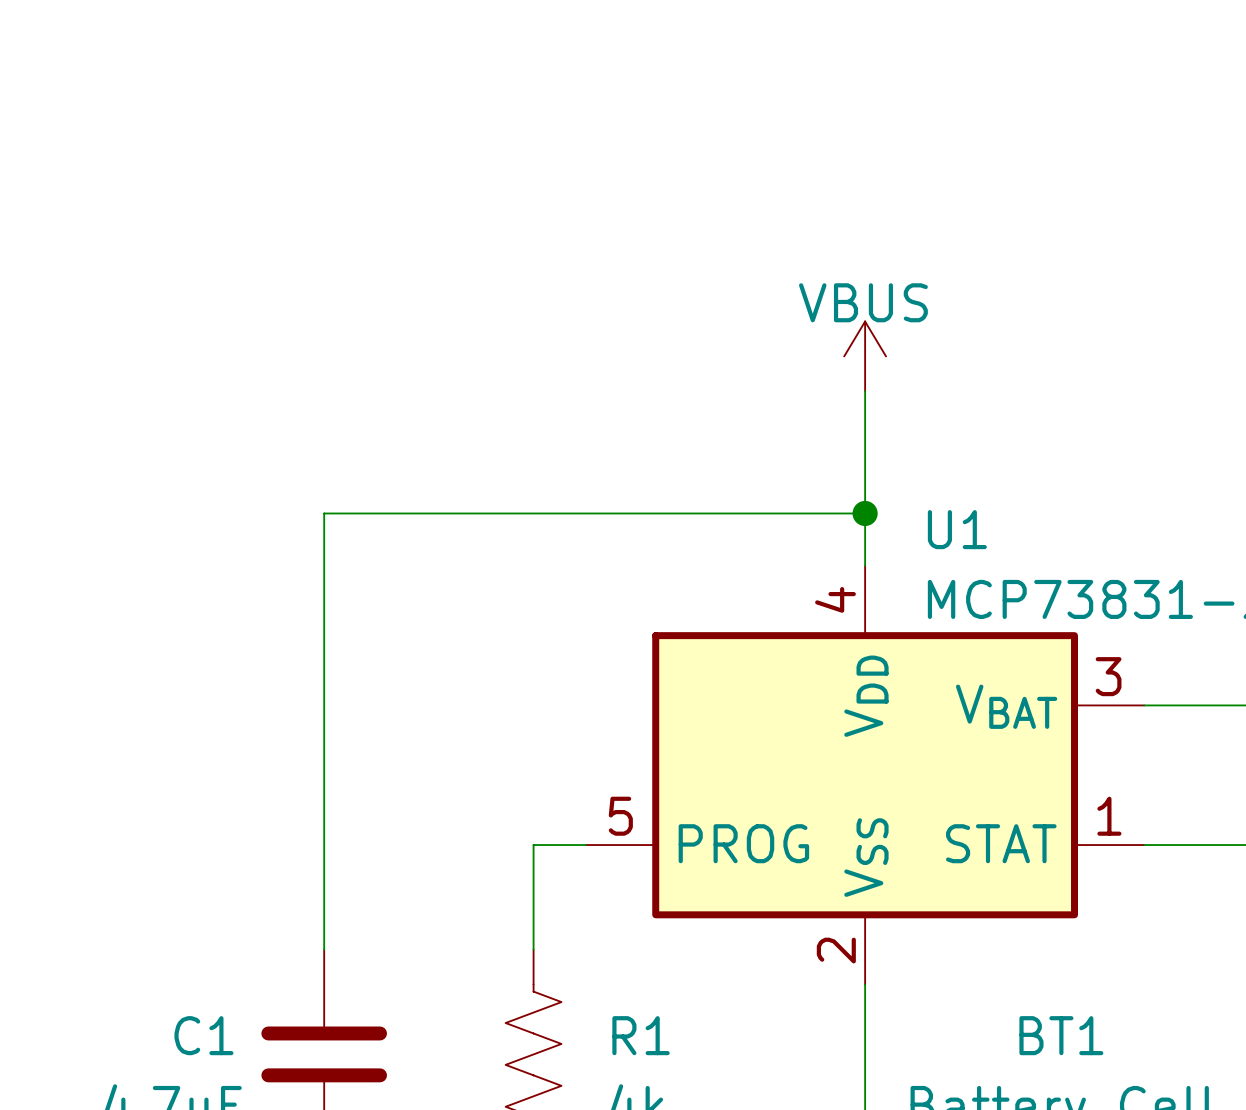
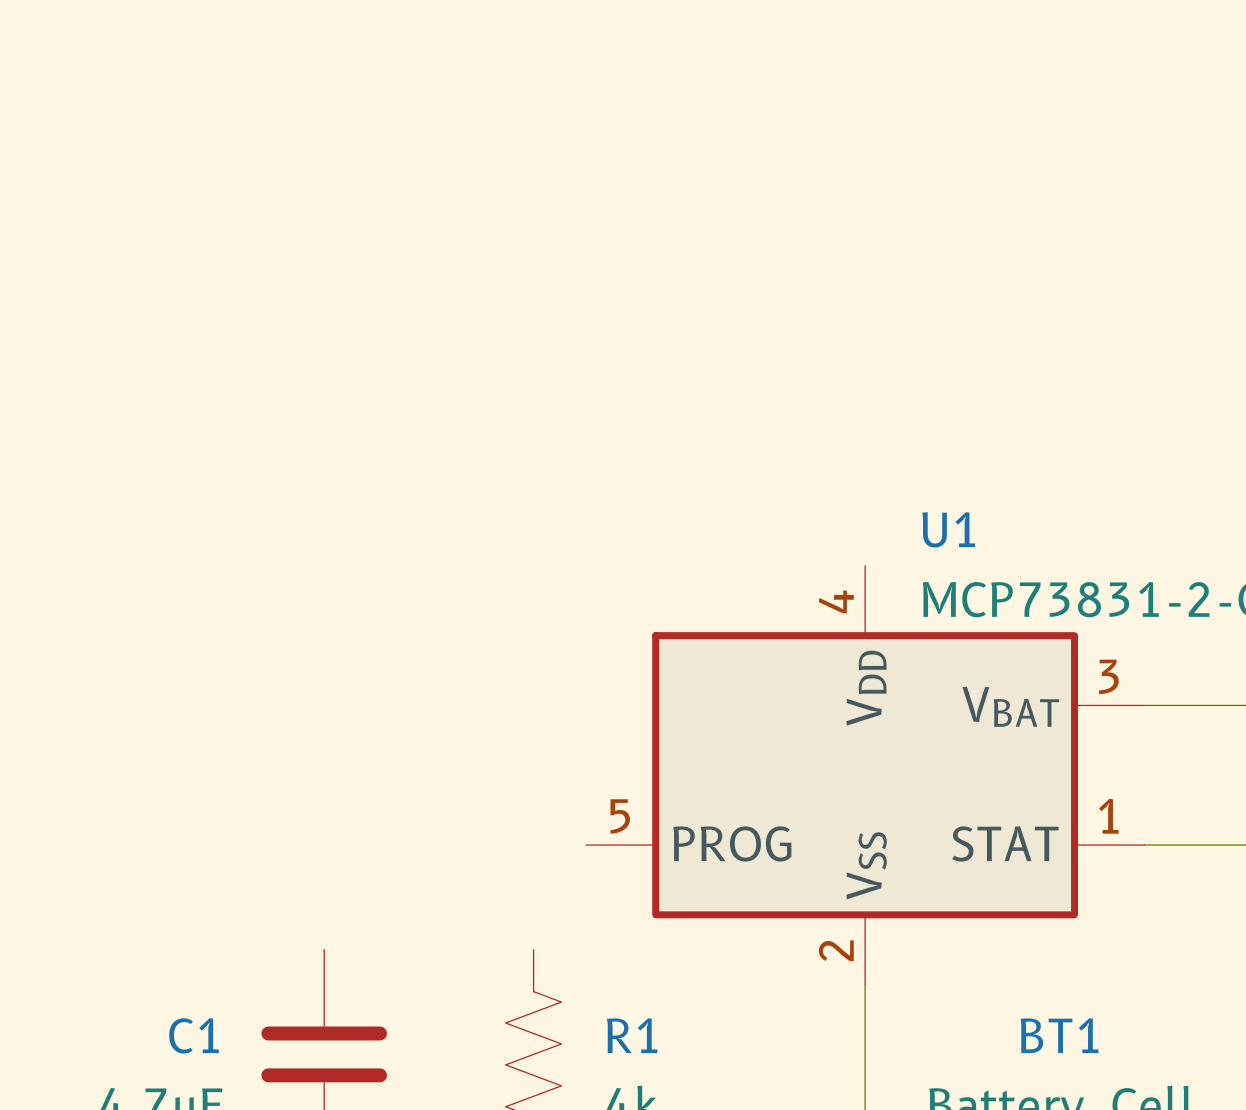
power symbol: VBUS (865, 356) -> none
wire: (865, 391) (865, 565) -> none
wire: (865, 513) (324, 513) (324, 949) -> none
junction: (865, 513) -> none
wire: (585, 845) (533, 845) (533, 949) -> none

